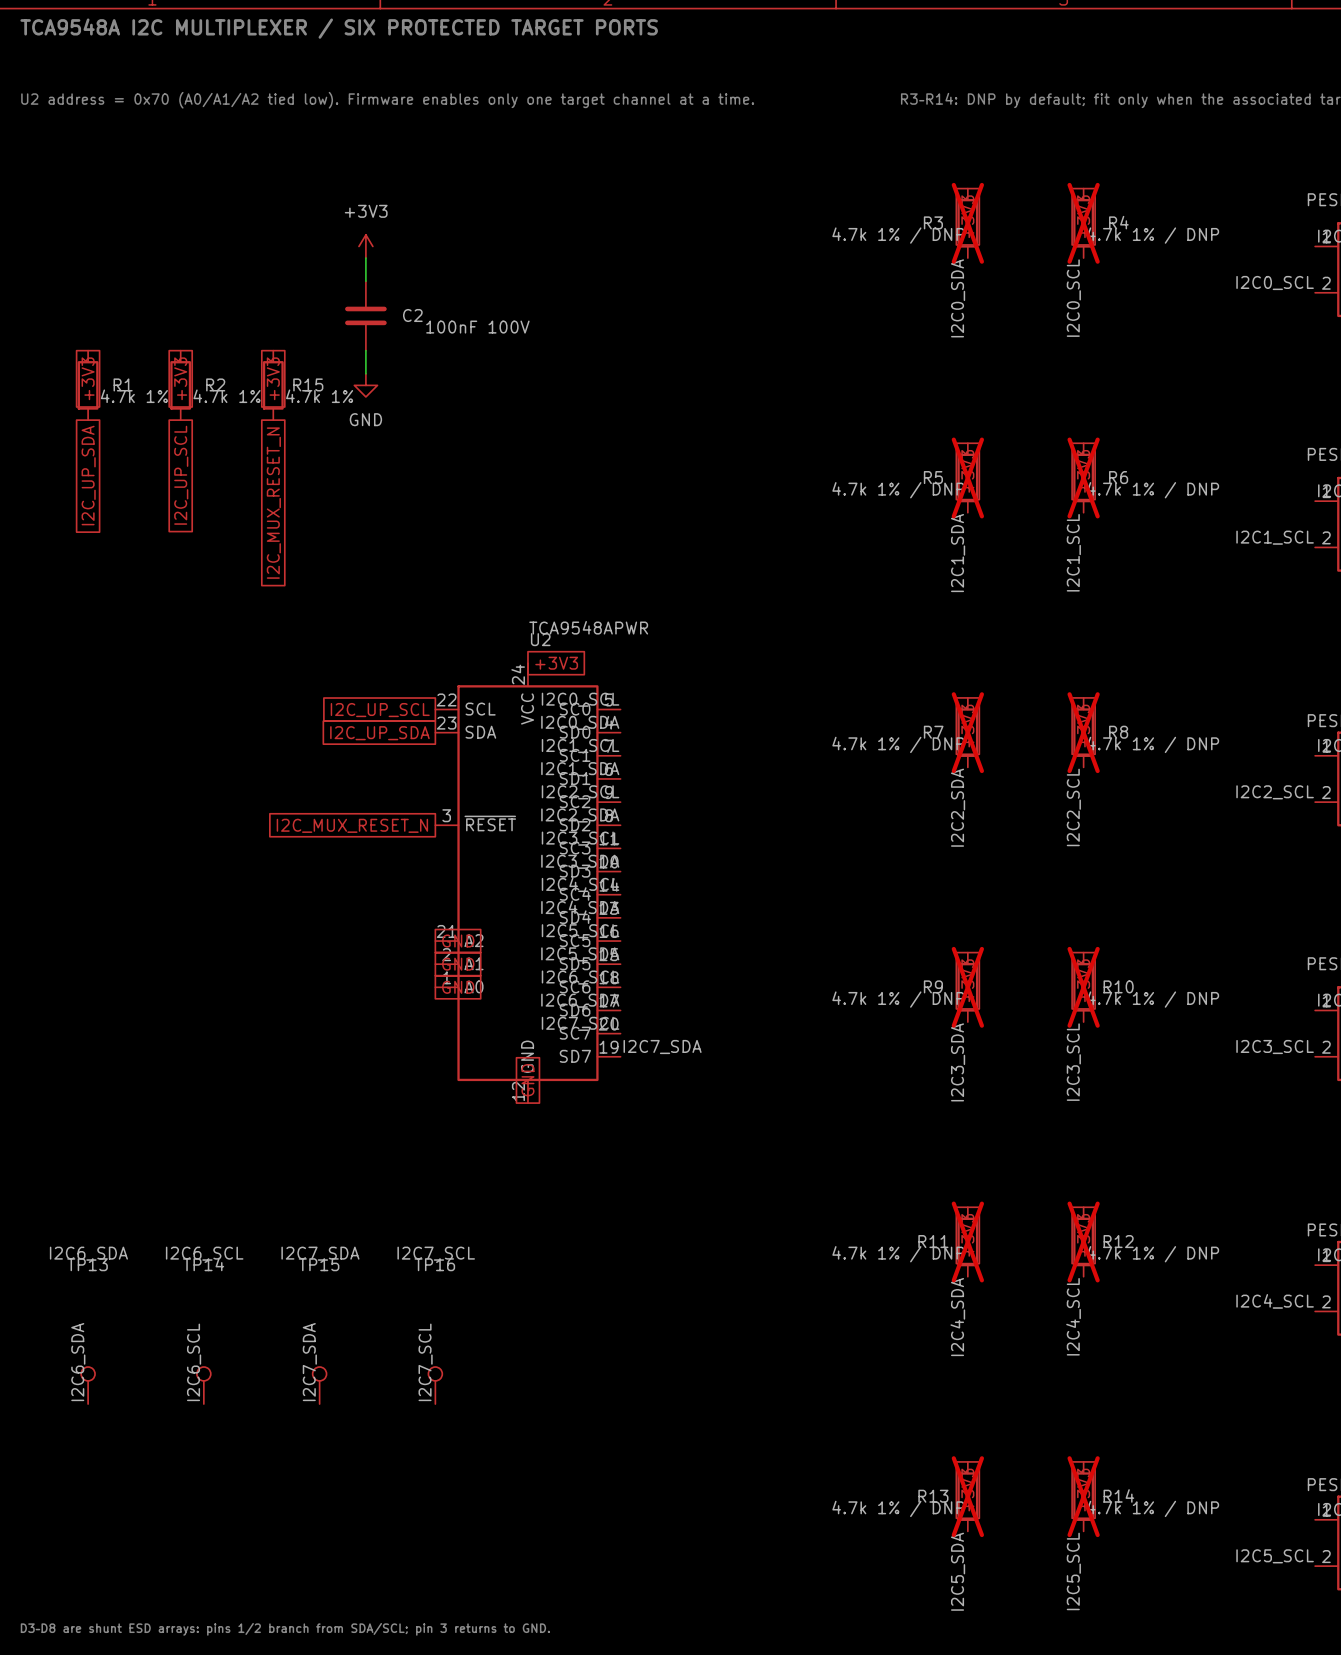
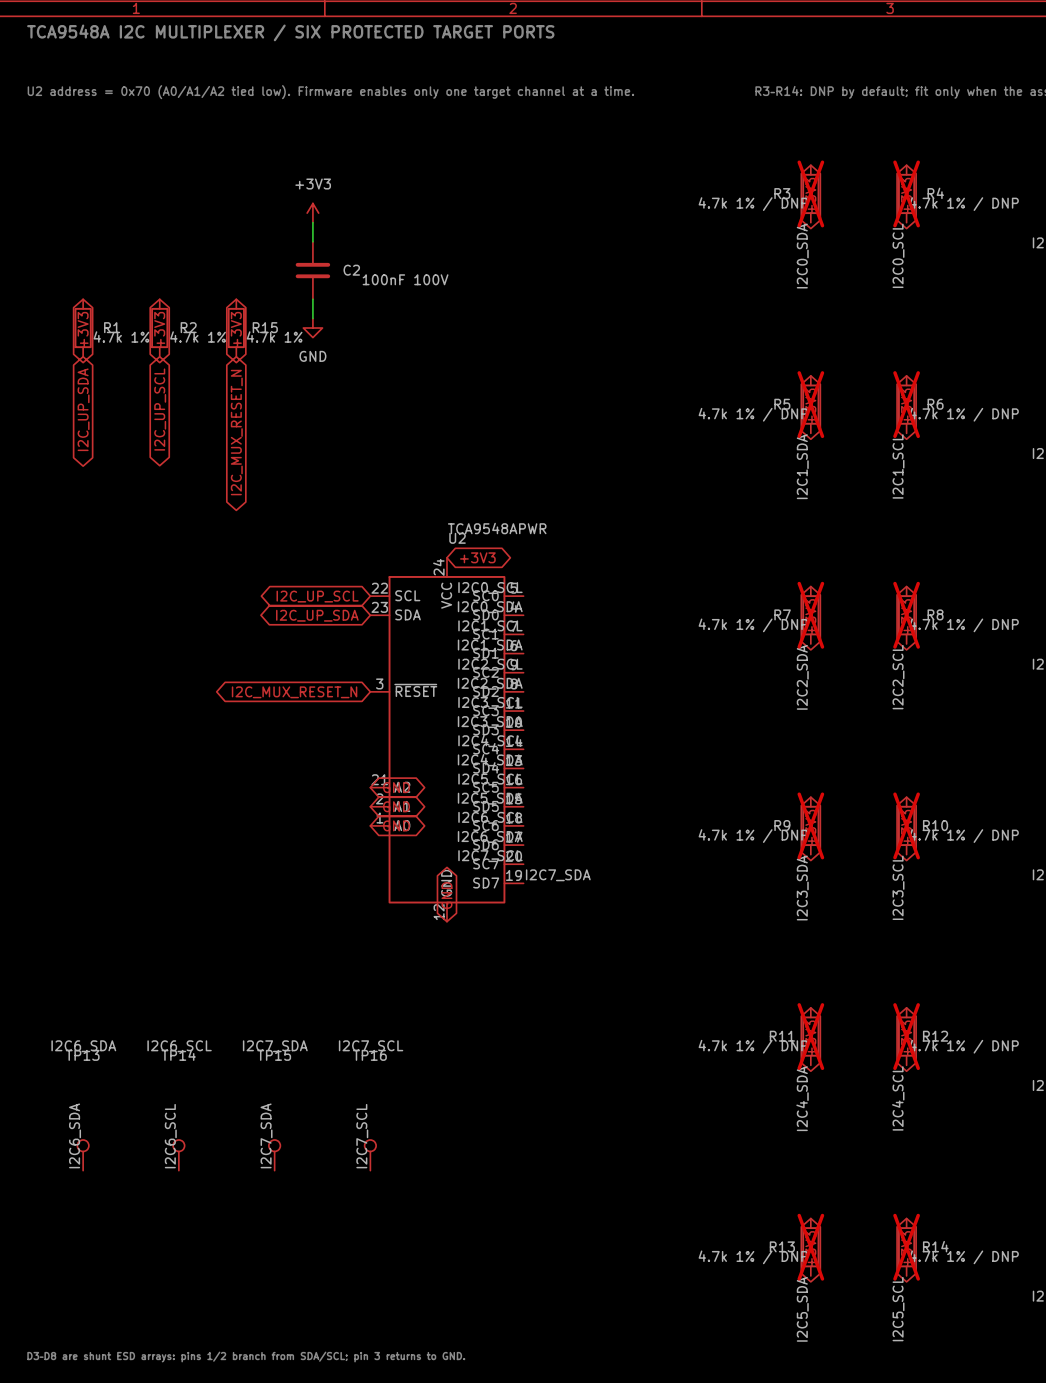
global label shape: passive (967, 216) -> bidirectional (810, 195)
global label shape: passive (1083, 216) -> bidirectional (906, 195)
global label shape: passive (88, 378) -> bidirectional (83, 329)
global label shape: passive (180, 378) -> bidirectional (159, 329)
global label shape: passive (273, 378) -> bidirectional (236, 329)
global label shape: passive (967, 471) -> bidirectional (810, 406)
global label shape: passive (1083, 471) -> bidirectional (906, 406)
global label shape: passive (88, 475) -> bidirectional (83, 409)
global label shape: passive (181, 475) -> bidirectional (160, 409)
global label shape: passive (273, 503) -> bidirectional (236, 432)
global label shape: passive (556, 663) -> bidirectional (477, 557)
global label shape: passive (380, 710) -> bidirectional (317, 596)
global label shape: passive (967, 726) -> bidirectional (810, 616)
global label shape: passive (1083, 726) -> bidirectional (906, 616)
global label shape: passive (379, 733) -> bidirectional (317, 615)
global label shape: passive (352, 825) -> bidirectional (294, 692)
global label shape: passive (458, 941) -> bidirectional (396, 787)
global label shape: passive (458, 964) -> bidirectional (396, 806)
global label shape: passive (967, 980) -> bidirectional (810, 827)
global label shape: passive (1083, 980) -> bidirectional (906, 827)
global label shape: passive (458, 987) -> bidirectional (396, 825)
global label shape: passive (527, 1080) -> bidirectional (446, 895)
global label shape: passive (967, 1235) -> bidirectional (810, 1038)
global label shape: passive (1083, 1235) -> bidirectional (906, 1038)
global label shape: passive (967, 1490) -> bidirectional (810, 1248)
global label shape: passive (1083, 1490) -> bidirectional (906, 1248)

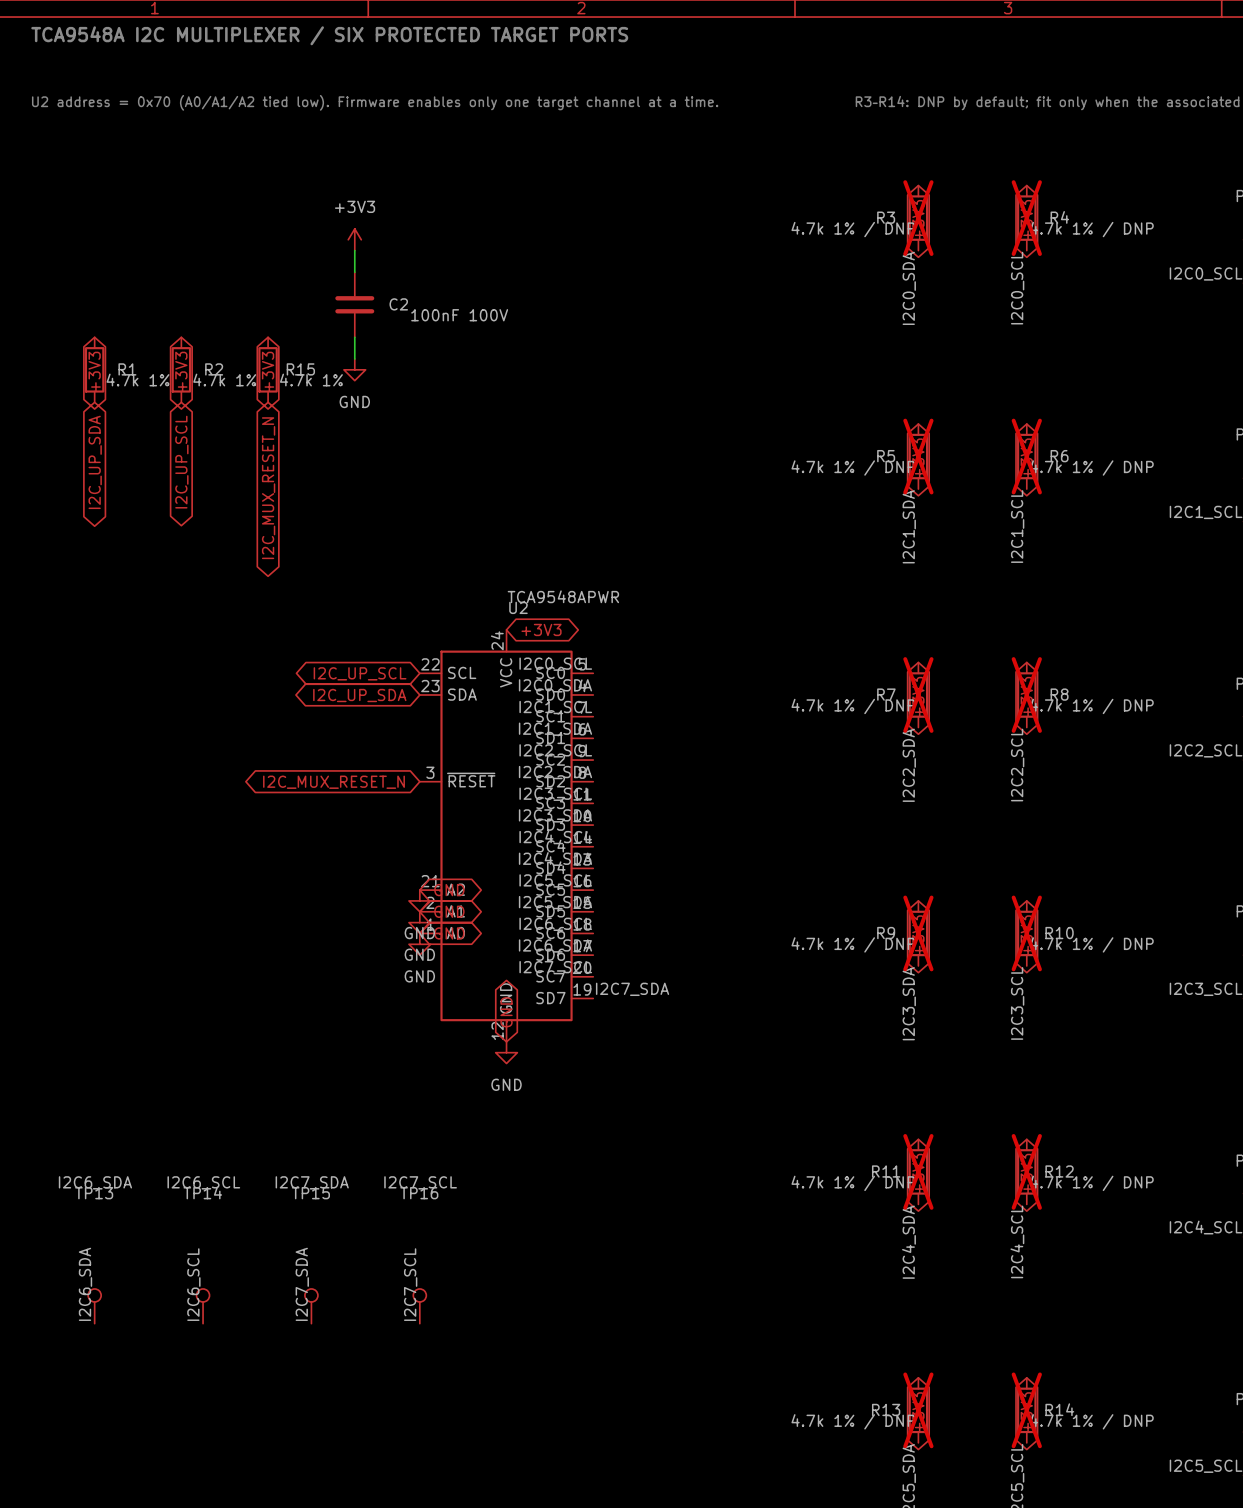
power symbol: none -> GND (419, 900)
power symbol: none -> GND (419, 922)
power symbol: none -> GND (419, 944)
power symbol: none -> GND (506, 1052)

